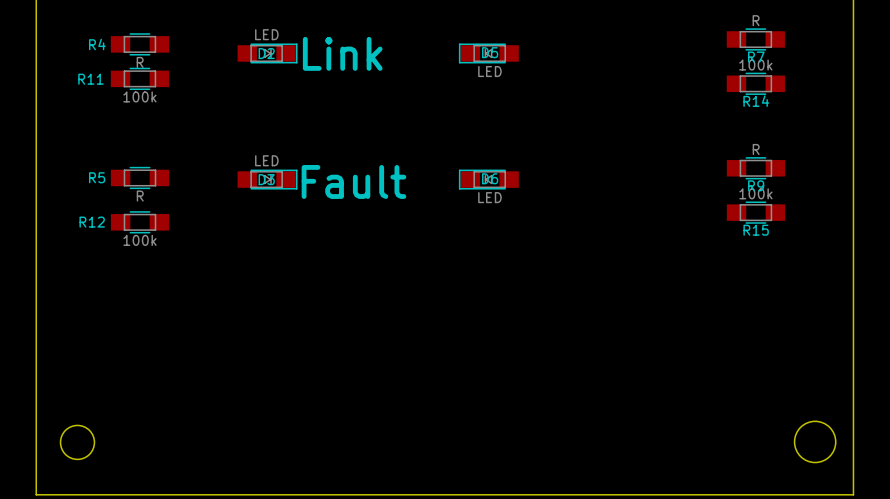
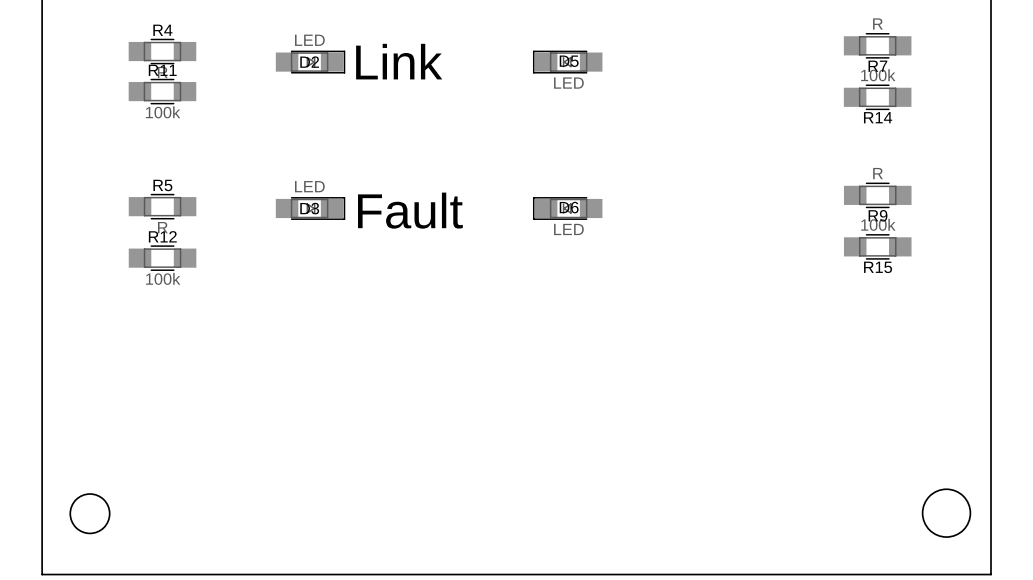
R4 name position: R4 (97, 44) -> R4 (162, 30)
R11 name position: R11 (90, 79) -> R11 (162, 70)
R5 name position: R5 (97, 177) -> R5 (162, 185)
R12 name position: R12 (92, 222) -> R12 (162, 236)

